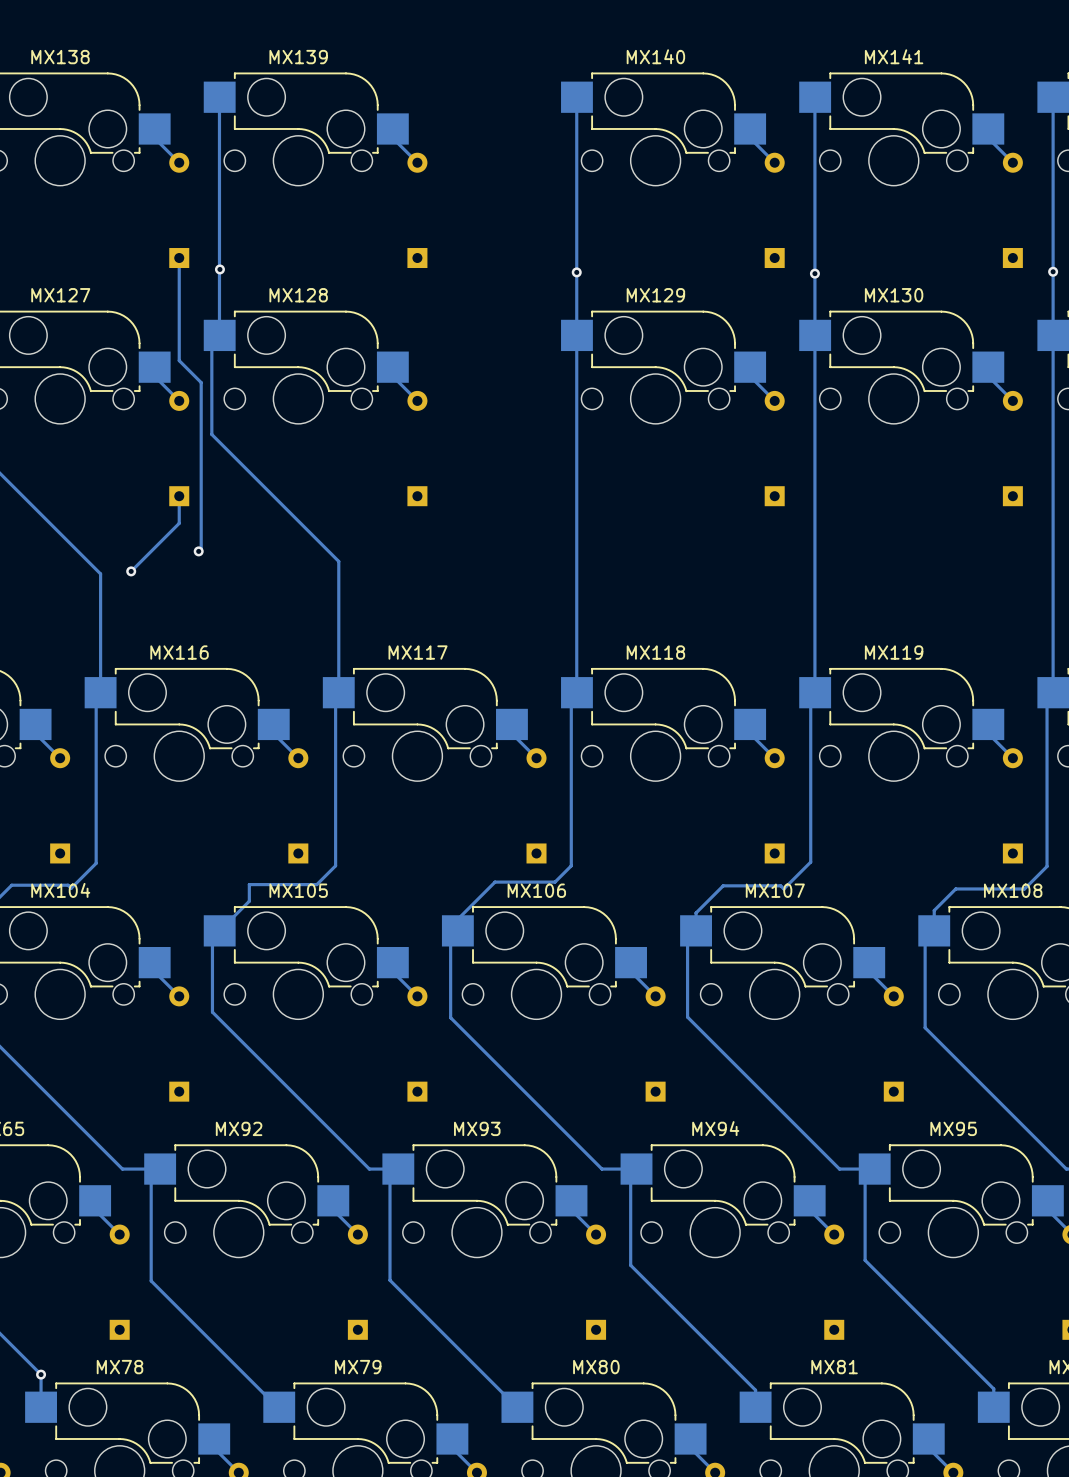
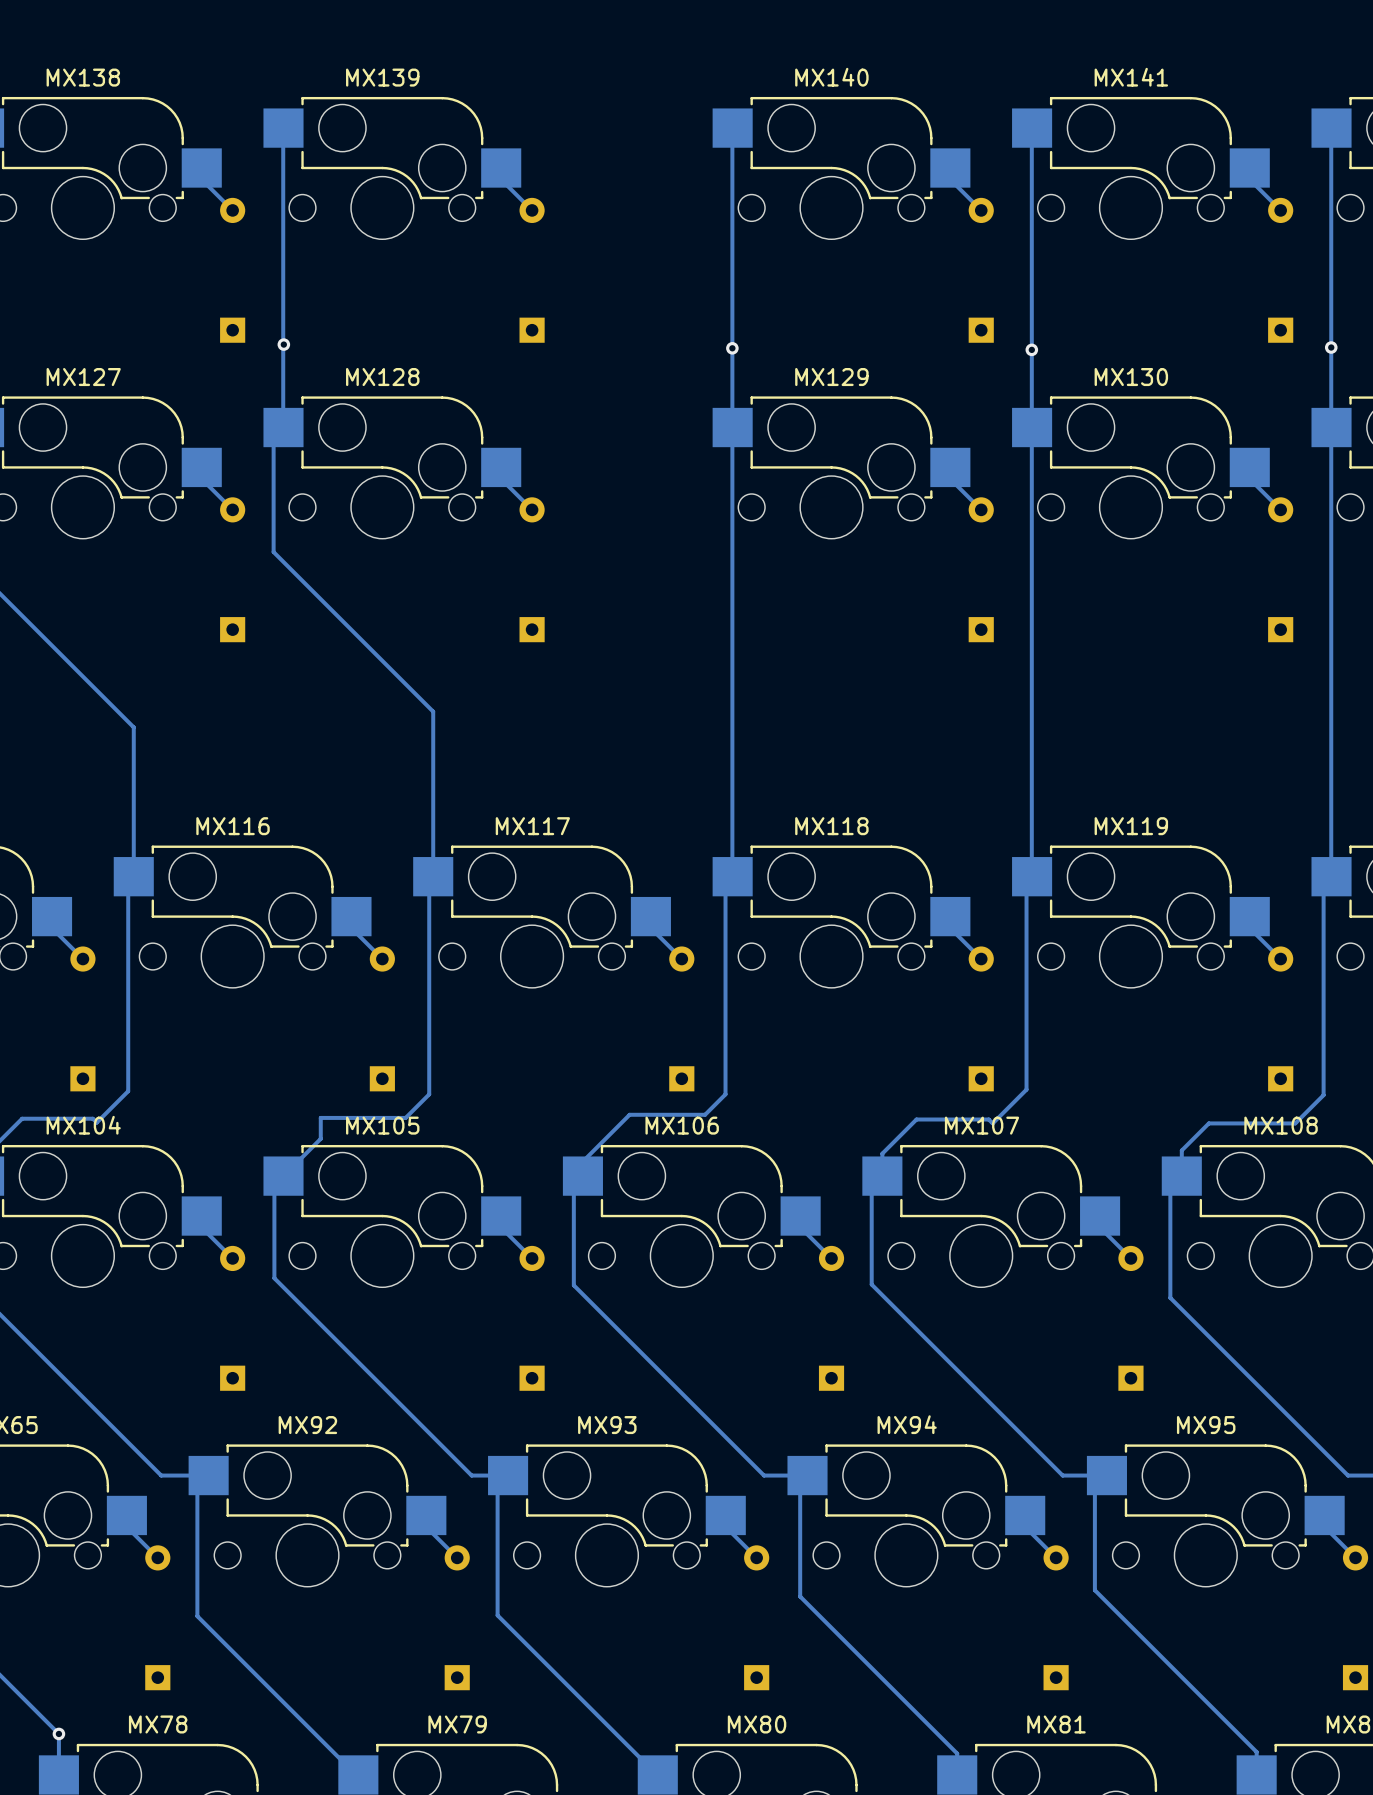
track: (179, 258) (179, 360) (201, 382) (201, 548) (198, 551) -> none
track: (179, 496) (179, 523) (131, 571) -> none
via: (198, 551) -> none
via: (131, 571) -> none

